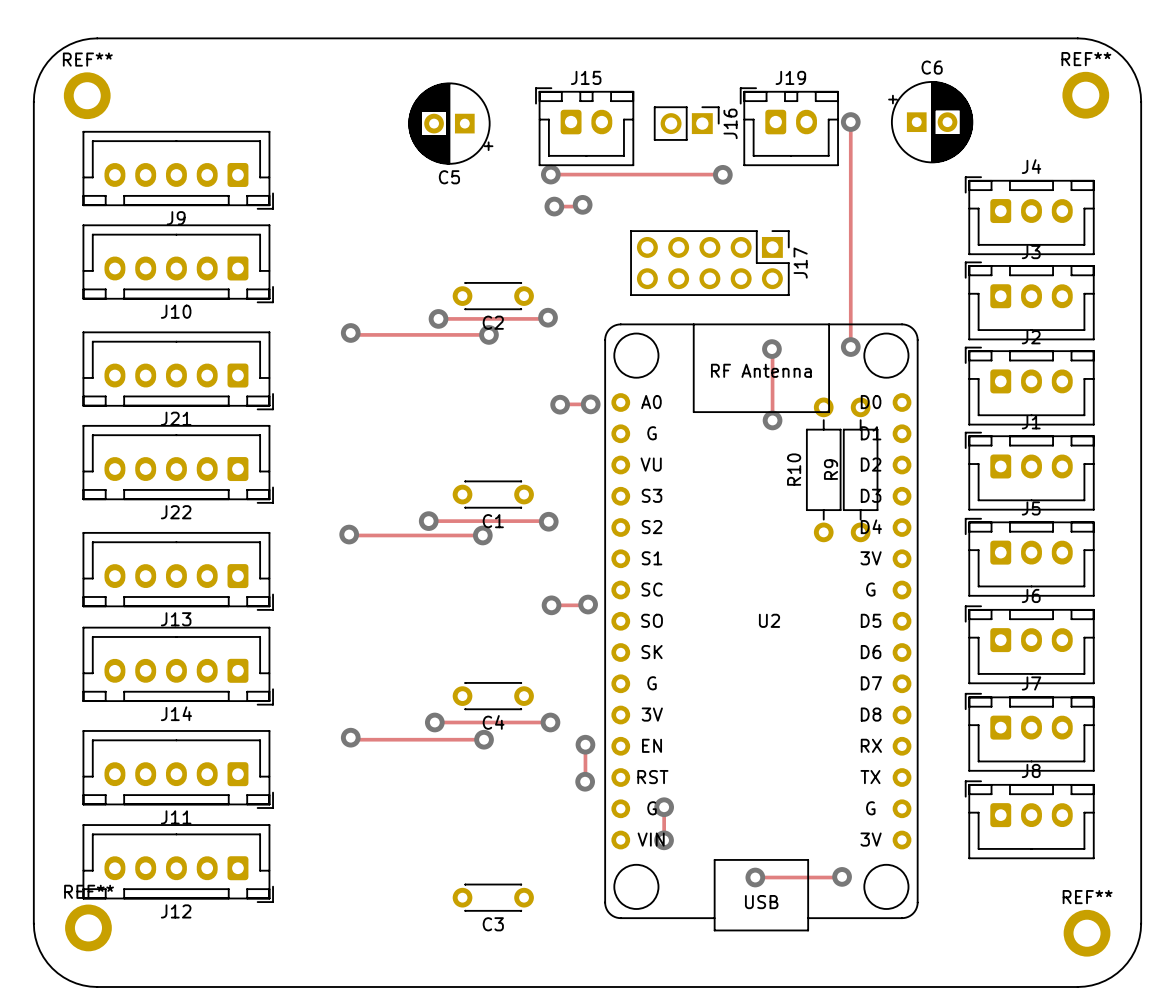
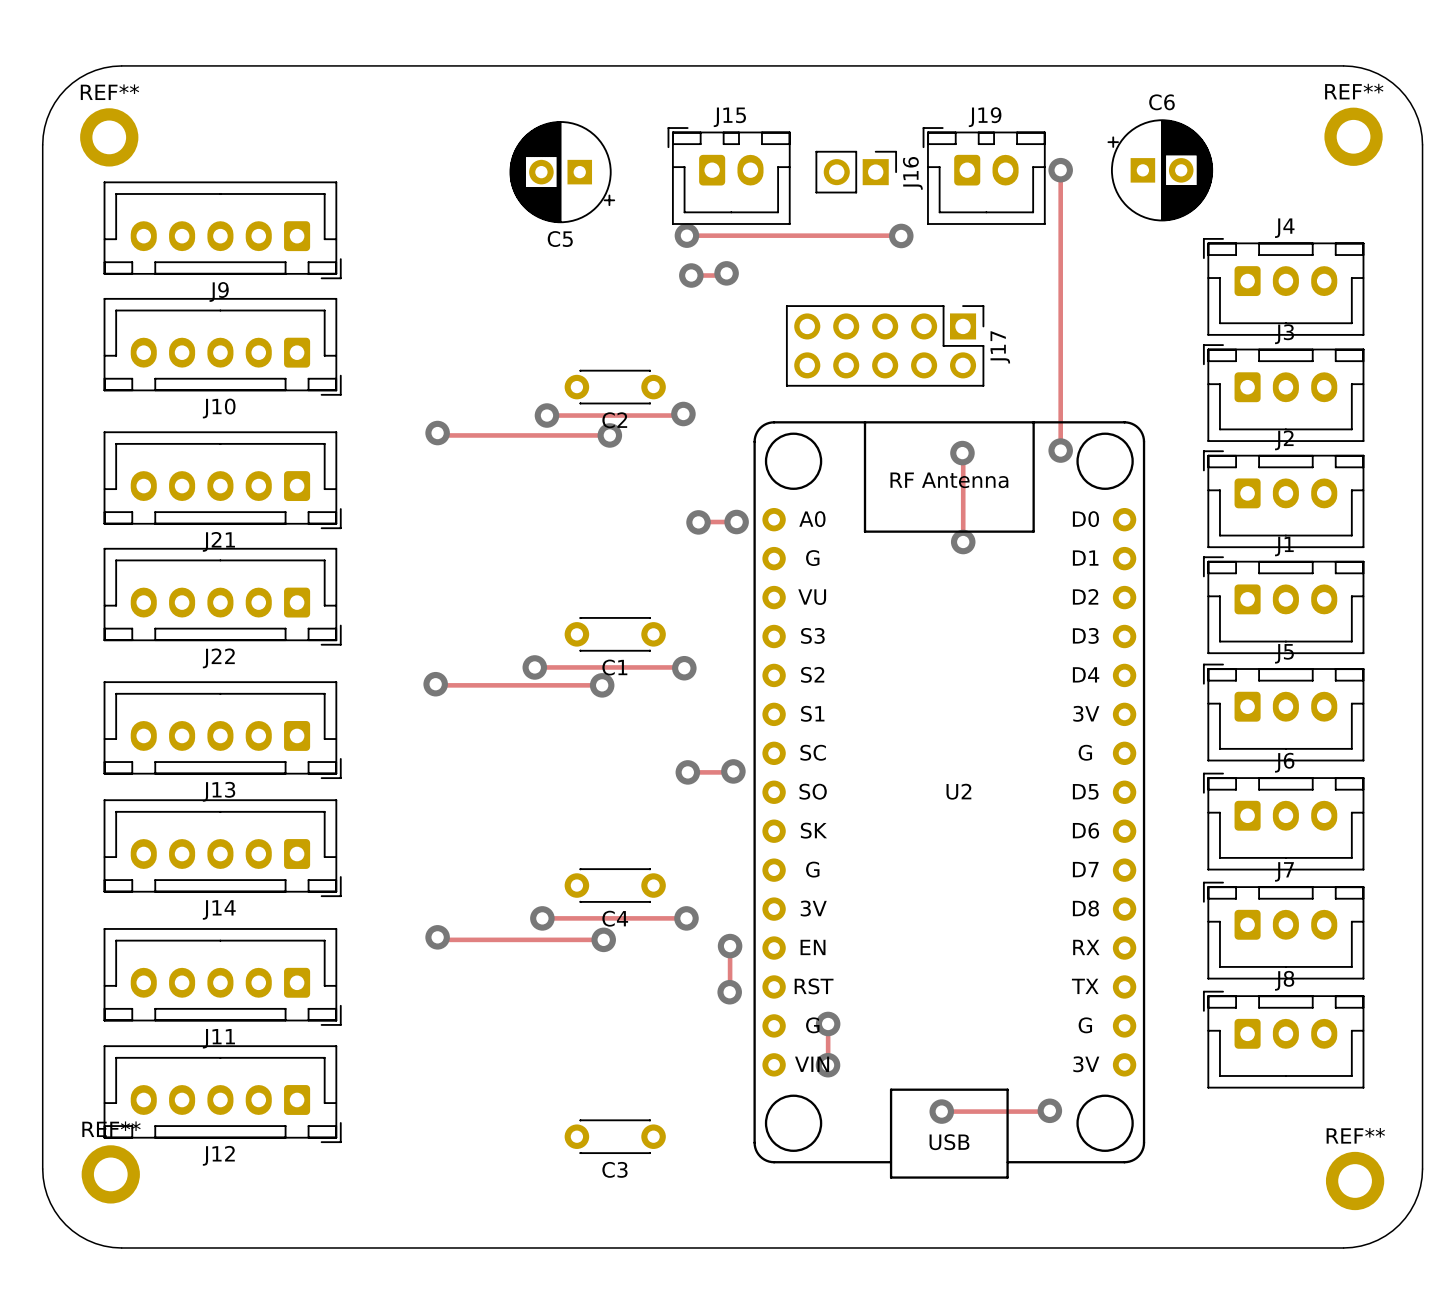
R10: (823, 469) -> none
R9: (860, 469) -> none

